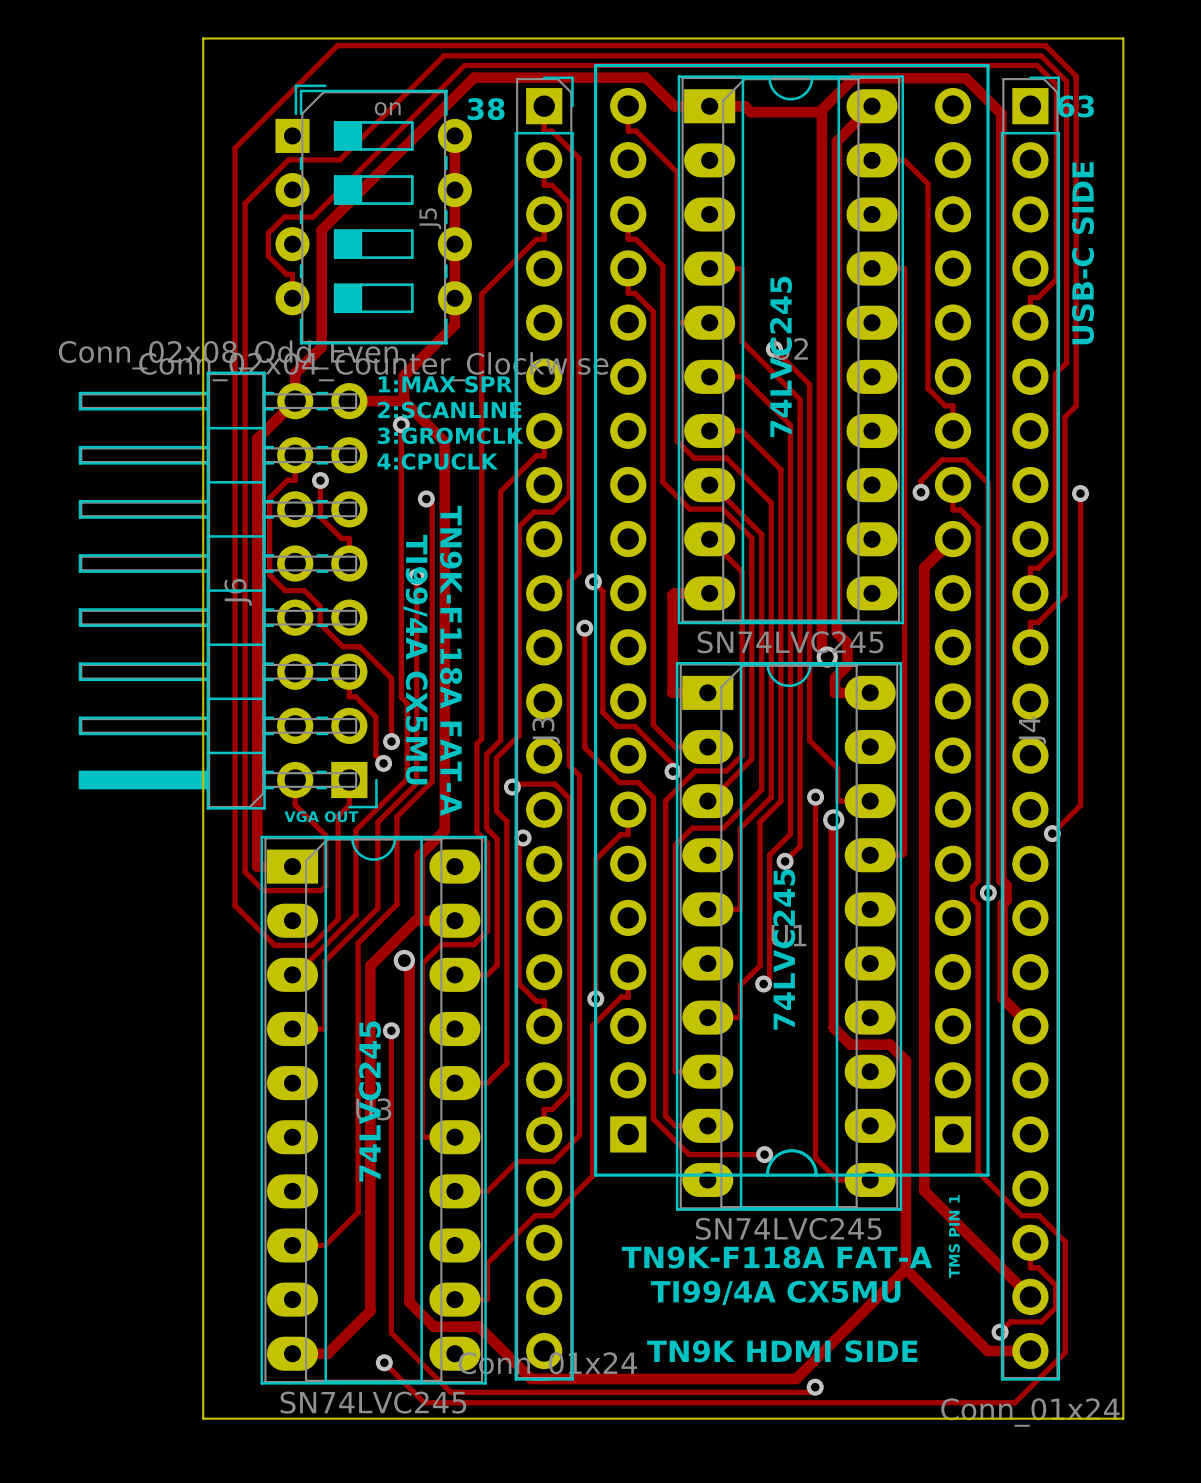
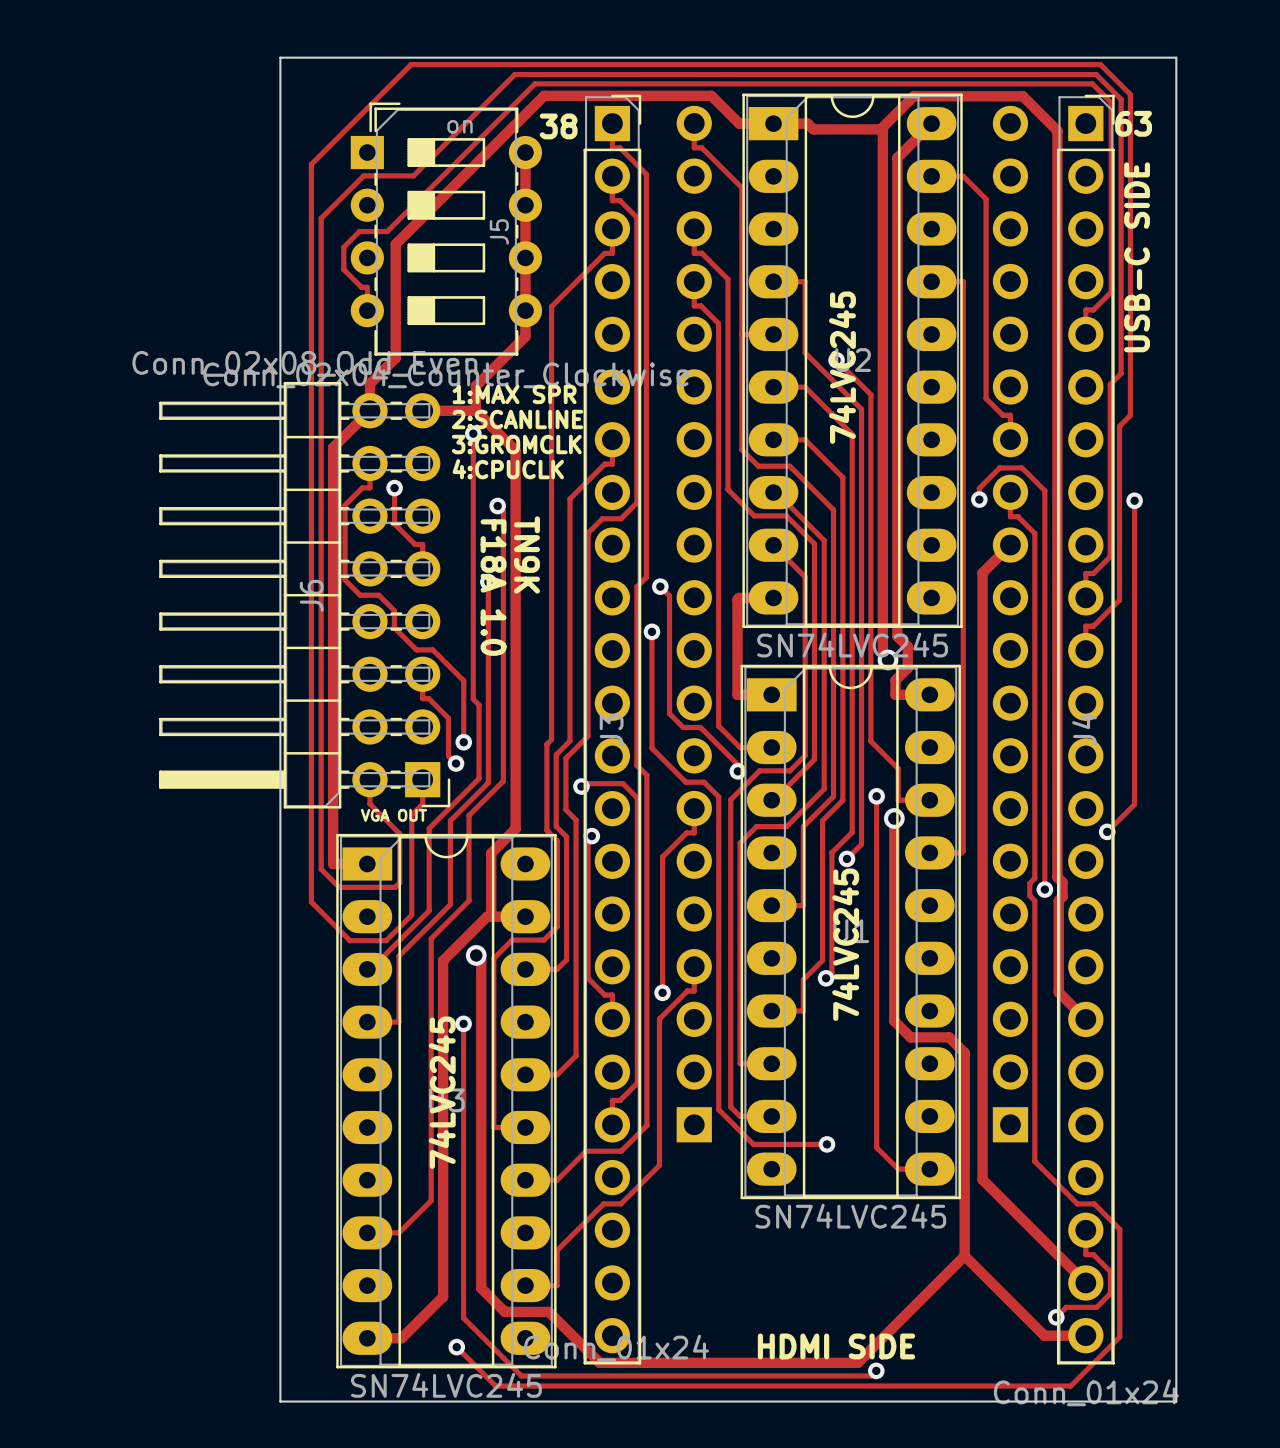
line: (595, 65) (988, 65) (988, 1175) (595, 1175) (595, 65) -> none
text: none -> TN9K (526, 554)
text: none -> F18A 1.0 (493, 587)
text: TI99/4A CX5MU (415, 659) -> none
text: TN9K-F118A FAT-A (451, 660) -> none
line: (767, 1175) (769, 1166) (773, 1158) (780, 1153) (791, 1150) (800, 1152) (807, 1156) (813, 1163) (816, 1175) -> none
text: TMS PIN 1 (954, 1236) -> none
text: TN9K-F118A FAT-A (776, 1257) -> none
text: TI99/4A CX5MU (775, 1292) -> none
text: TN9K HDMI SIDE (782, 1351) -> HDMI SIDE (836, 1346)

